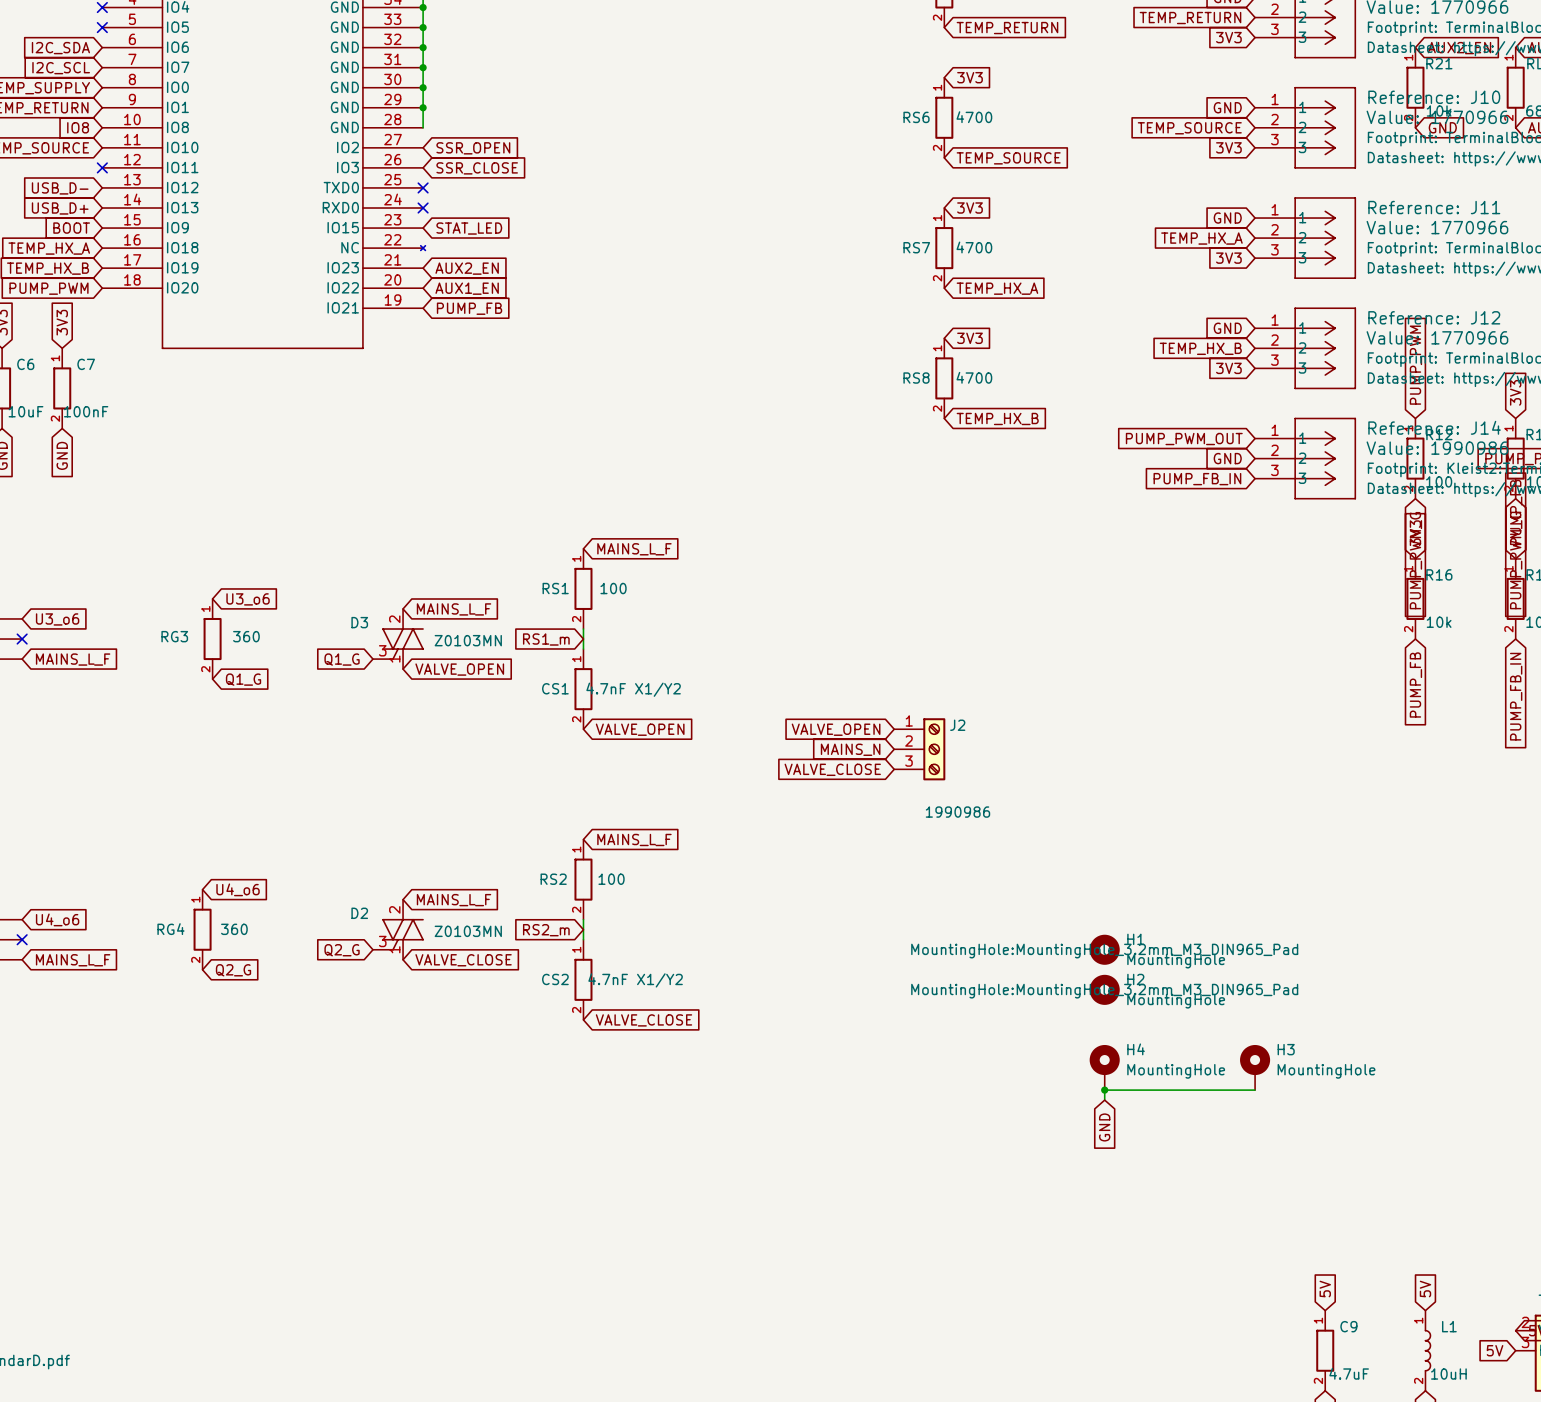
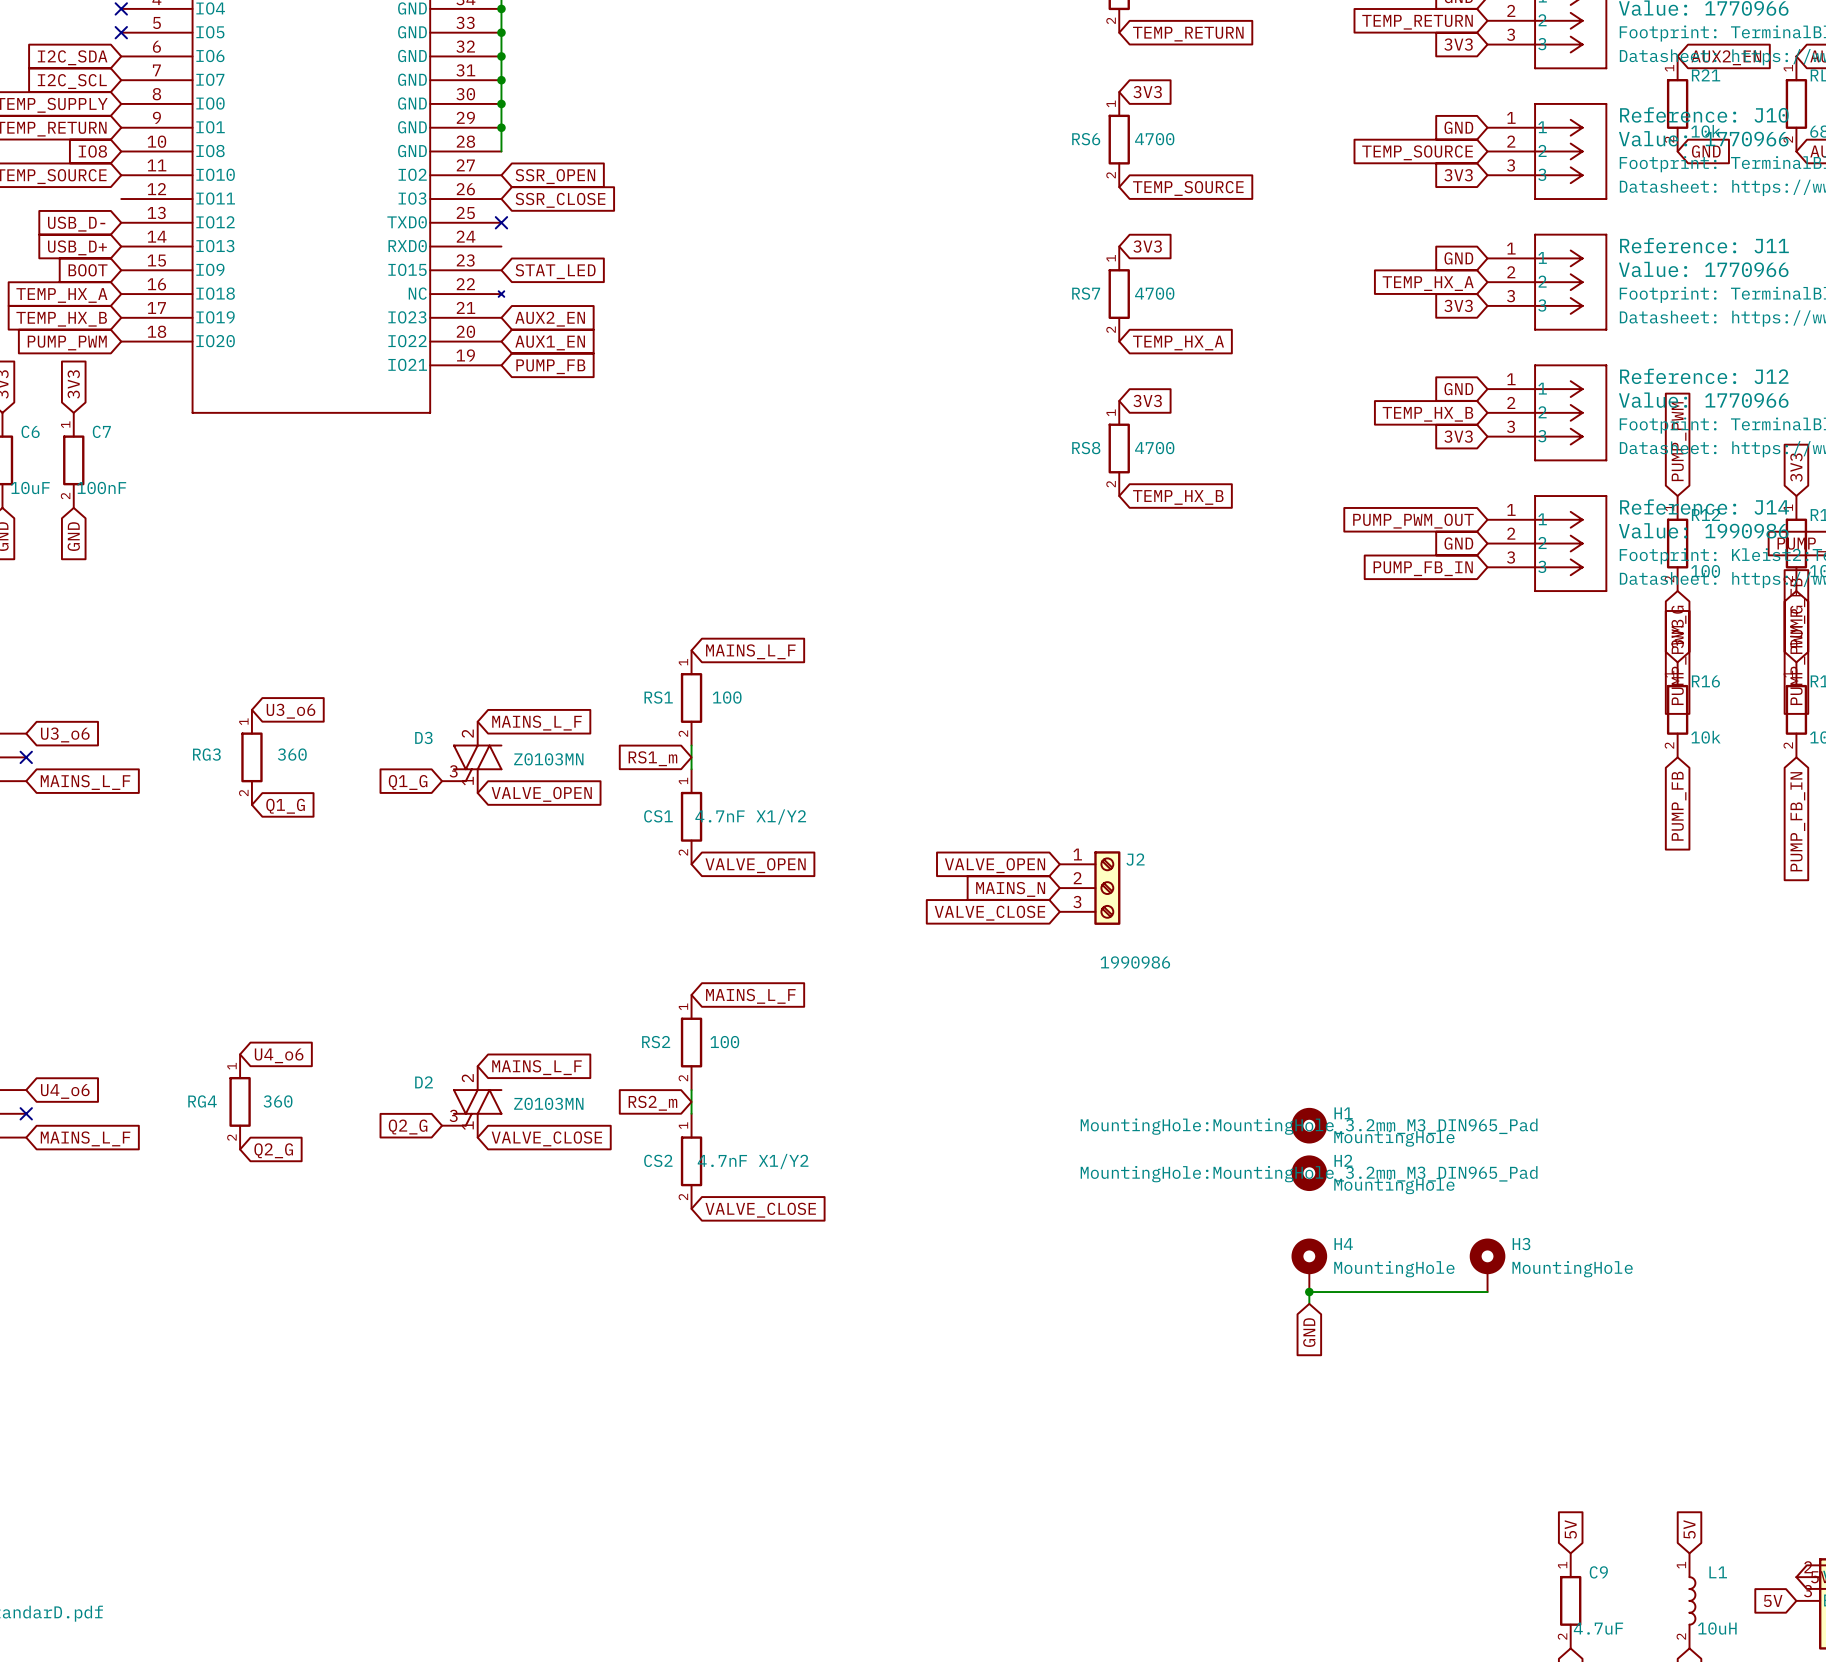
no-connect mark: (102, 167) -> none
no-connect mark: (423, 208) -> none

